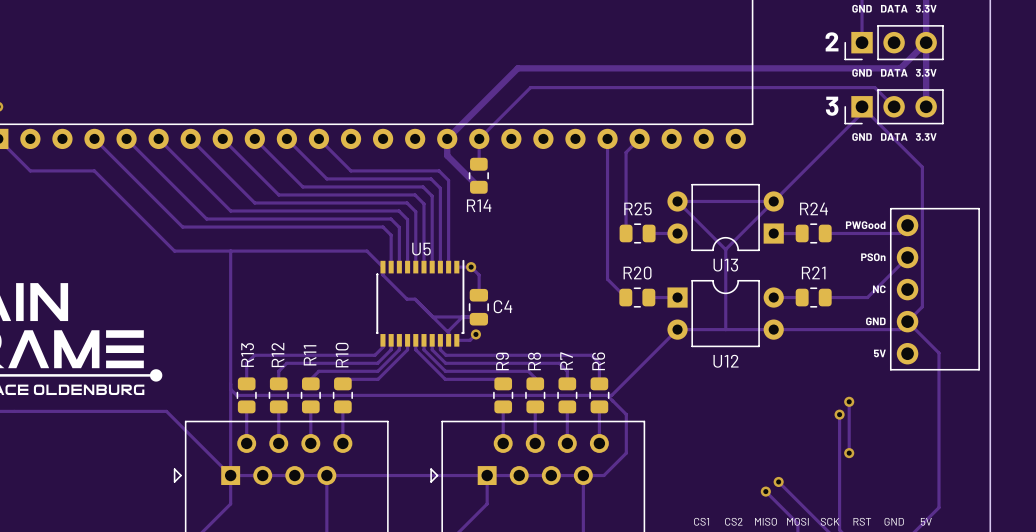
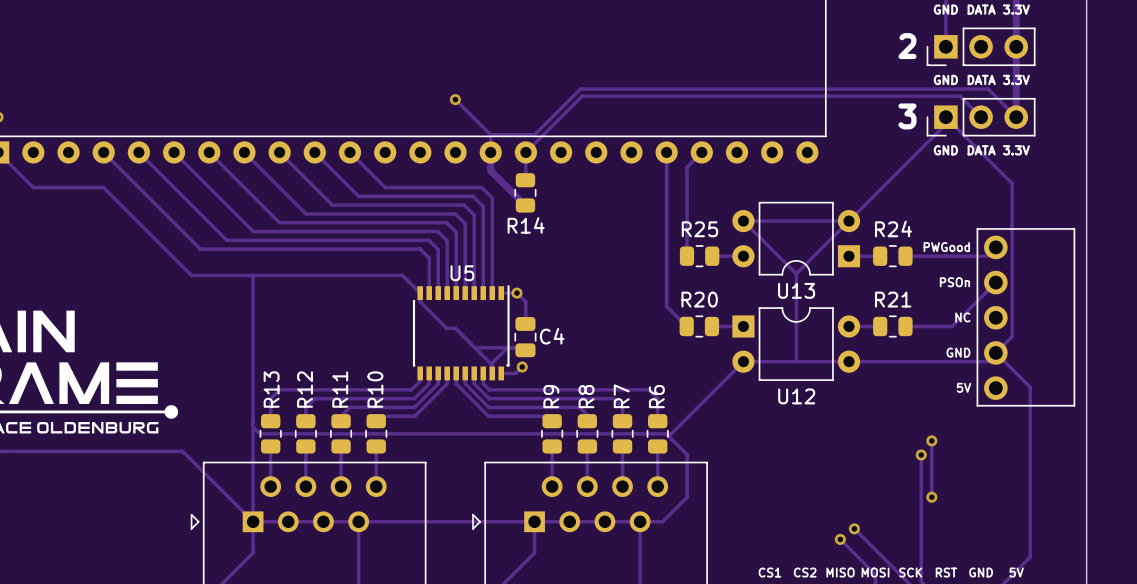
track: (926, 42) (900, 68) (517, 68) (447, 138) -> (455, 99) (490, 134) (490, 152)
via: none -> (455, 99)
track: none -> (1016, 117) (988, 89) (580, 89) (534, 134) (490, 134)

